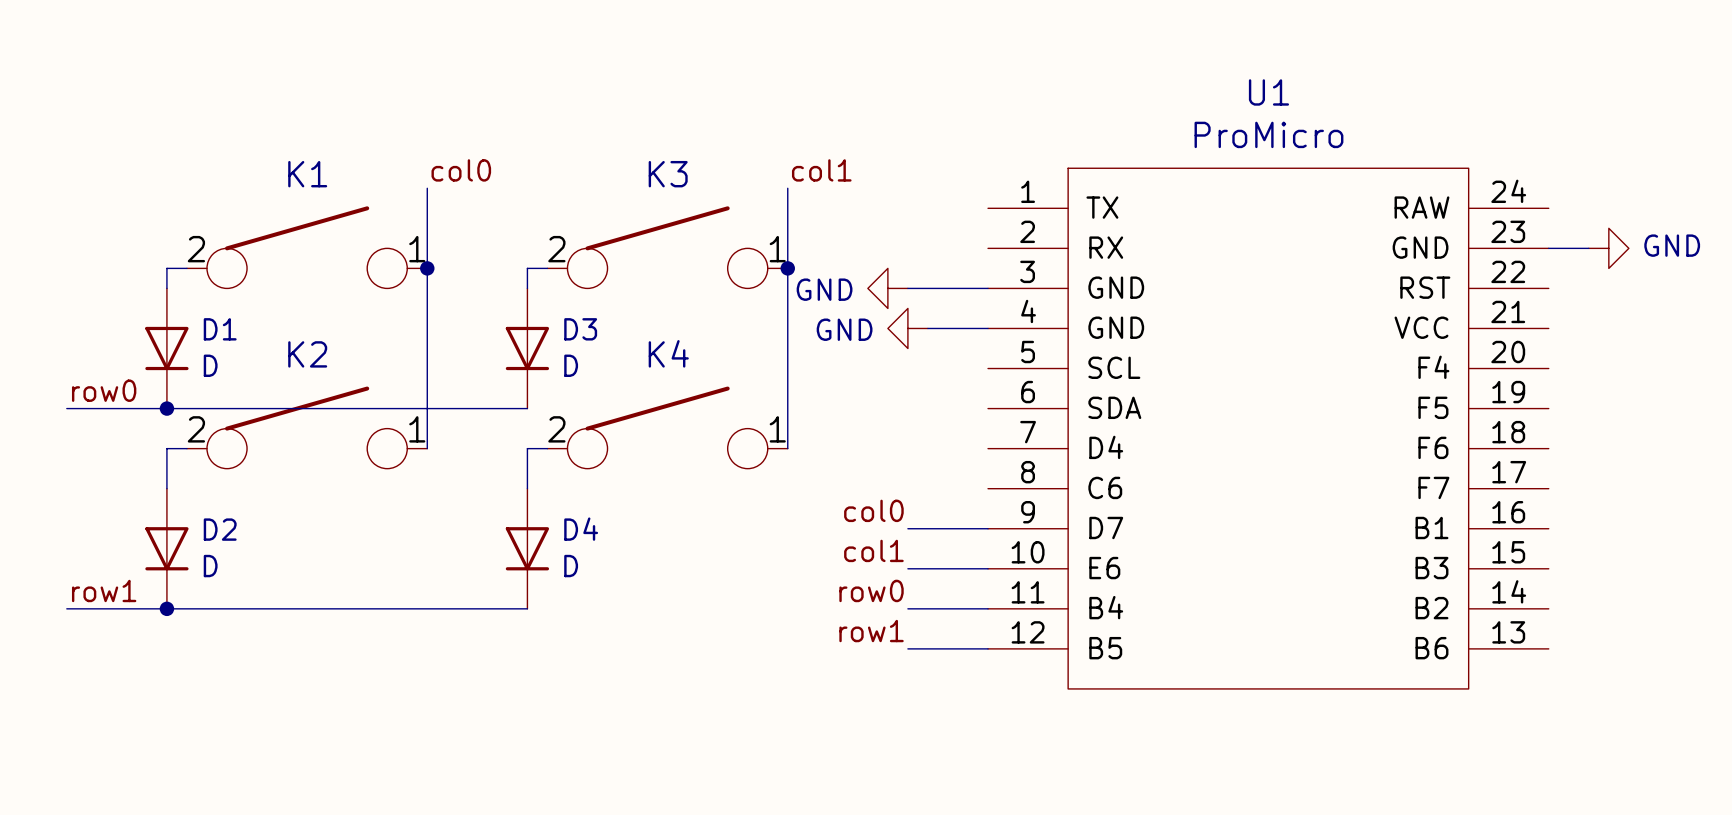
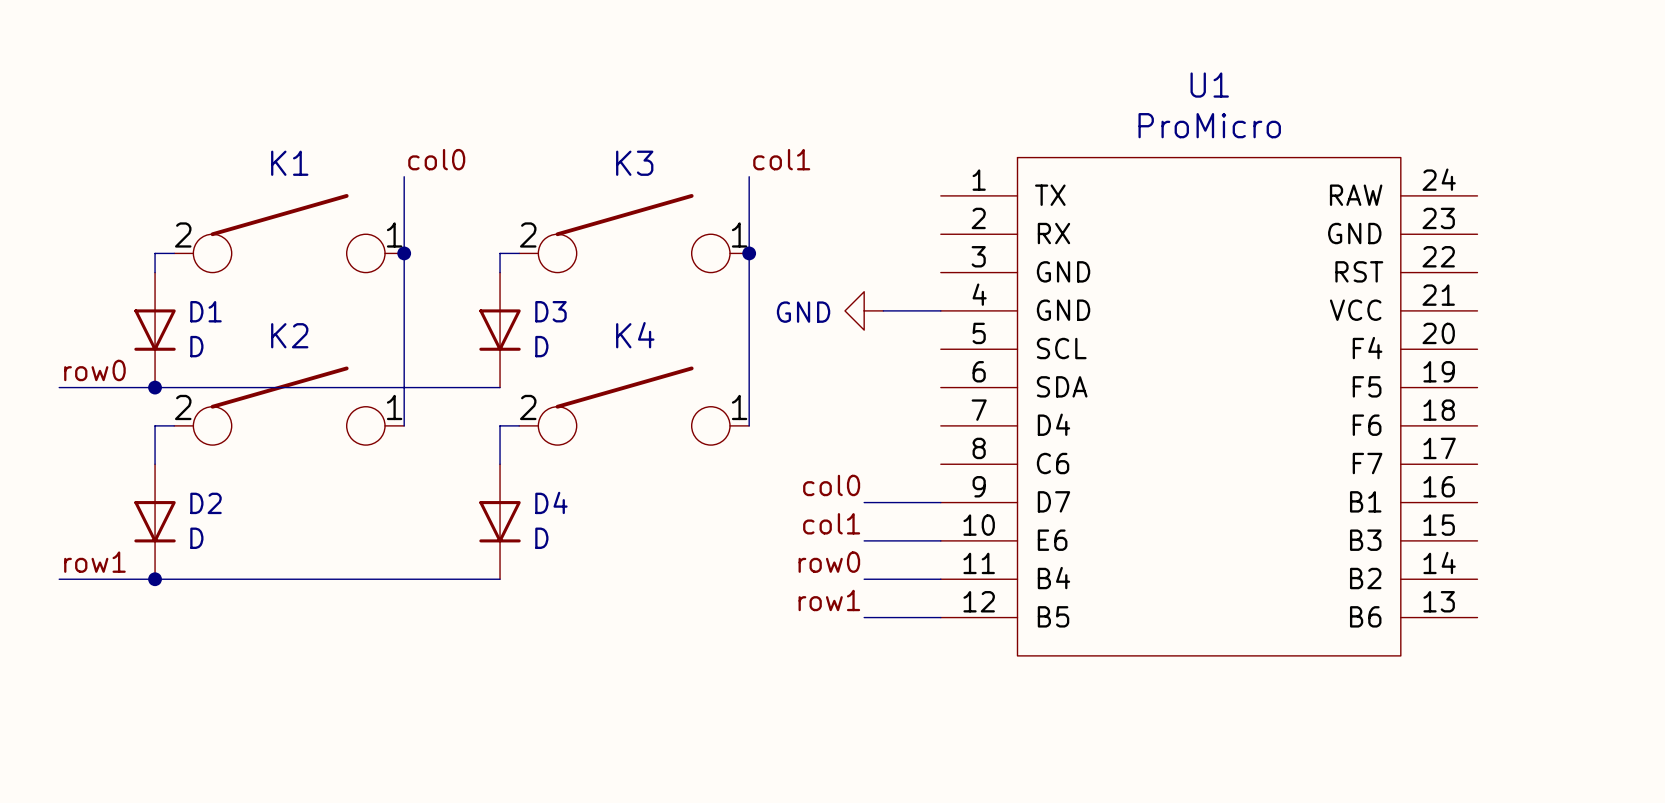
wire: (1548, 248) (1588, 248) -> none
power symbol: GND (1608, 248) -> none
power symbol: GND (887, 288) -> none
wire: (907, 288) (988, 288) -> none

